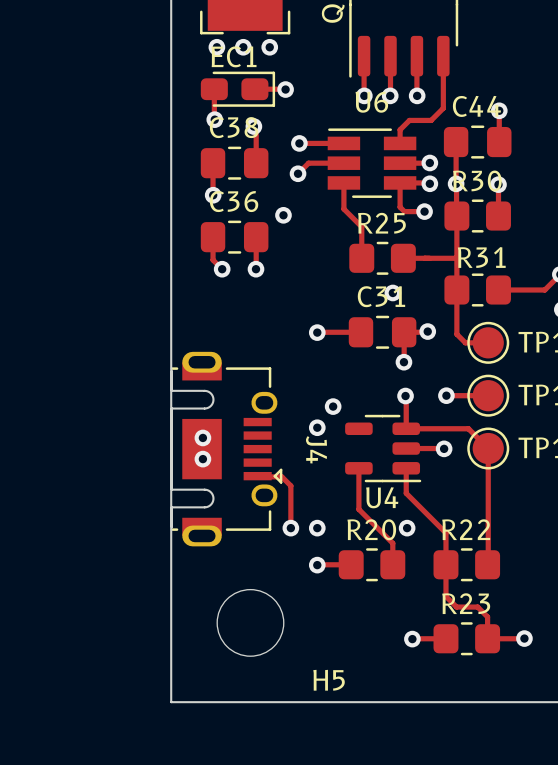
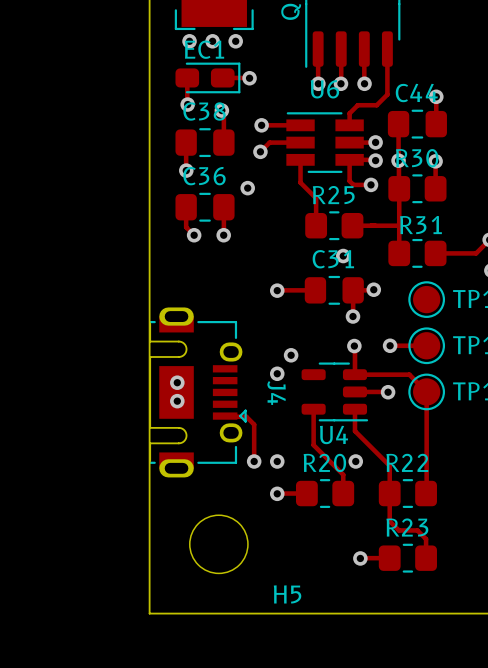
track: (456, 290) (456, 334) (465, 342) (488, 342) -> none
track: (487, 638) (524, 638) -> none
via: (524, 638) -> none

